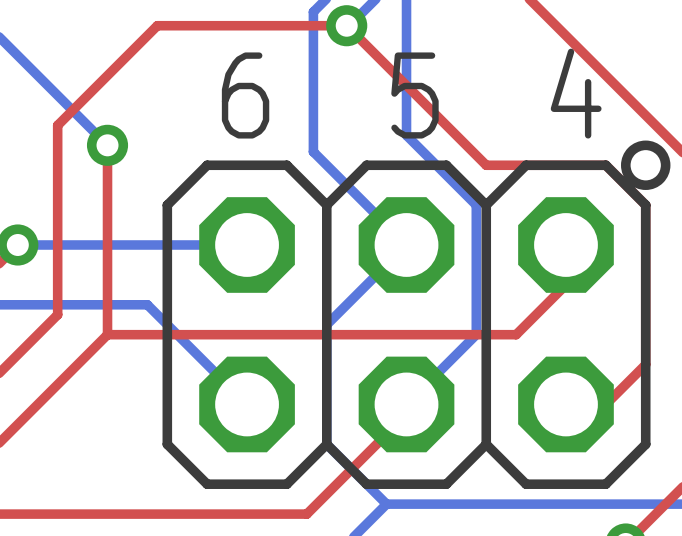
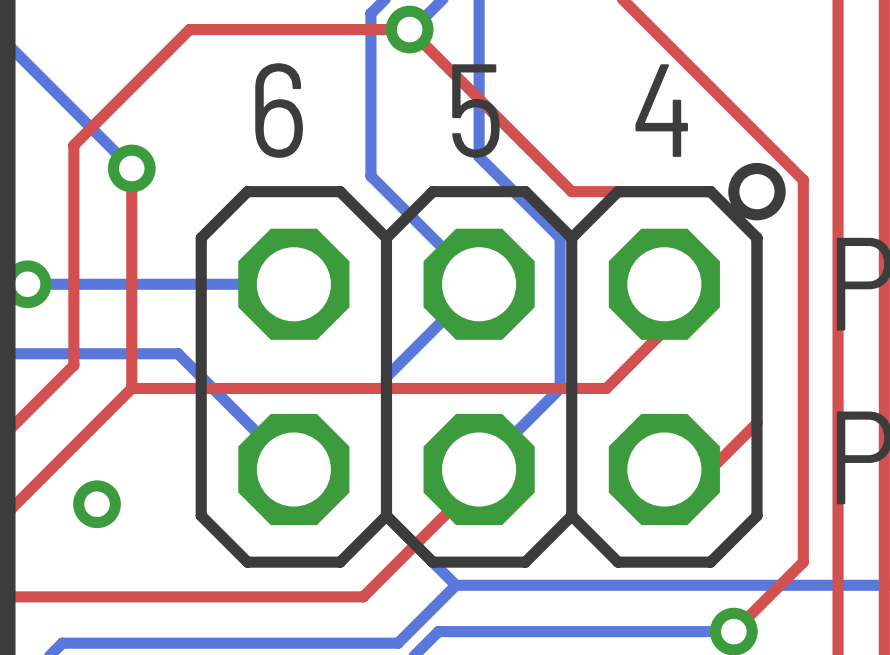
via: none -> (97, 504)

